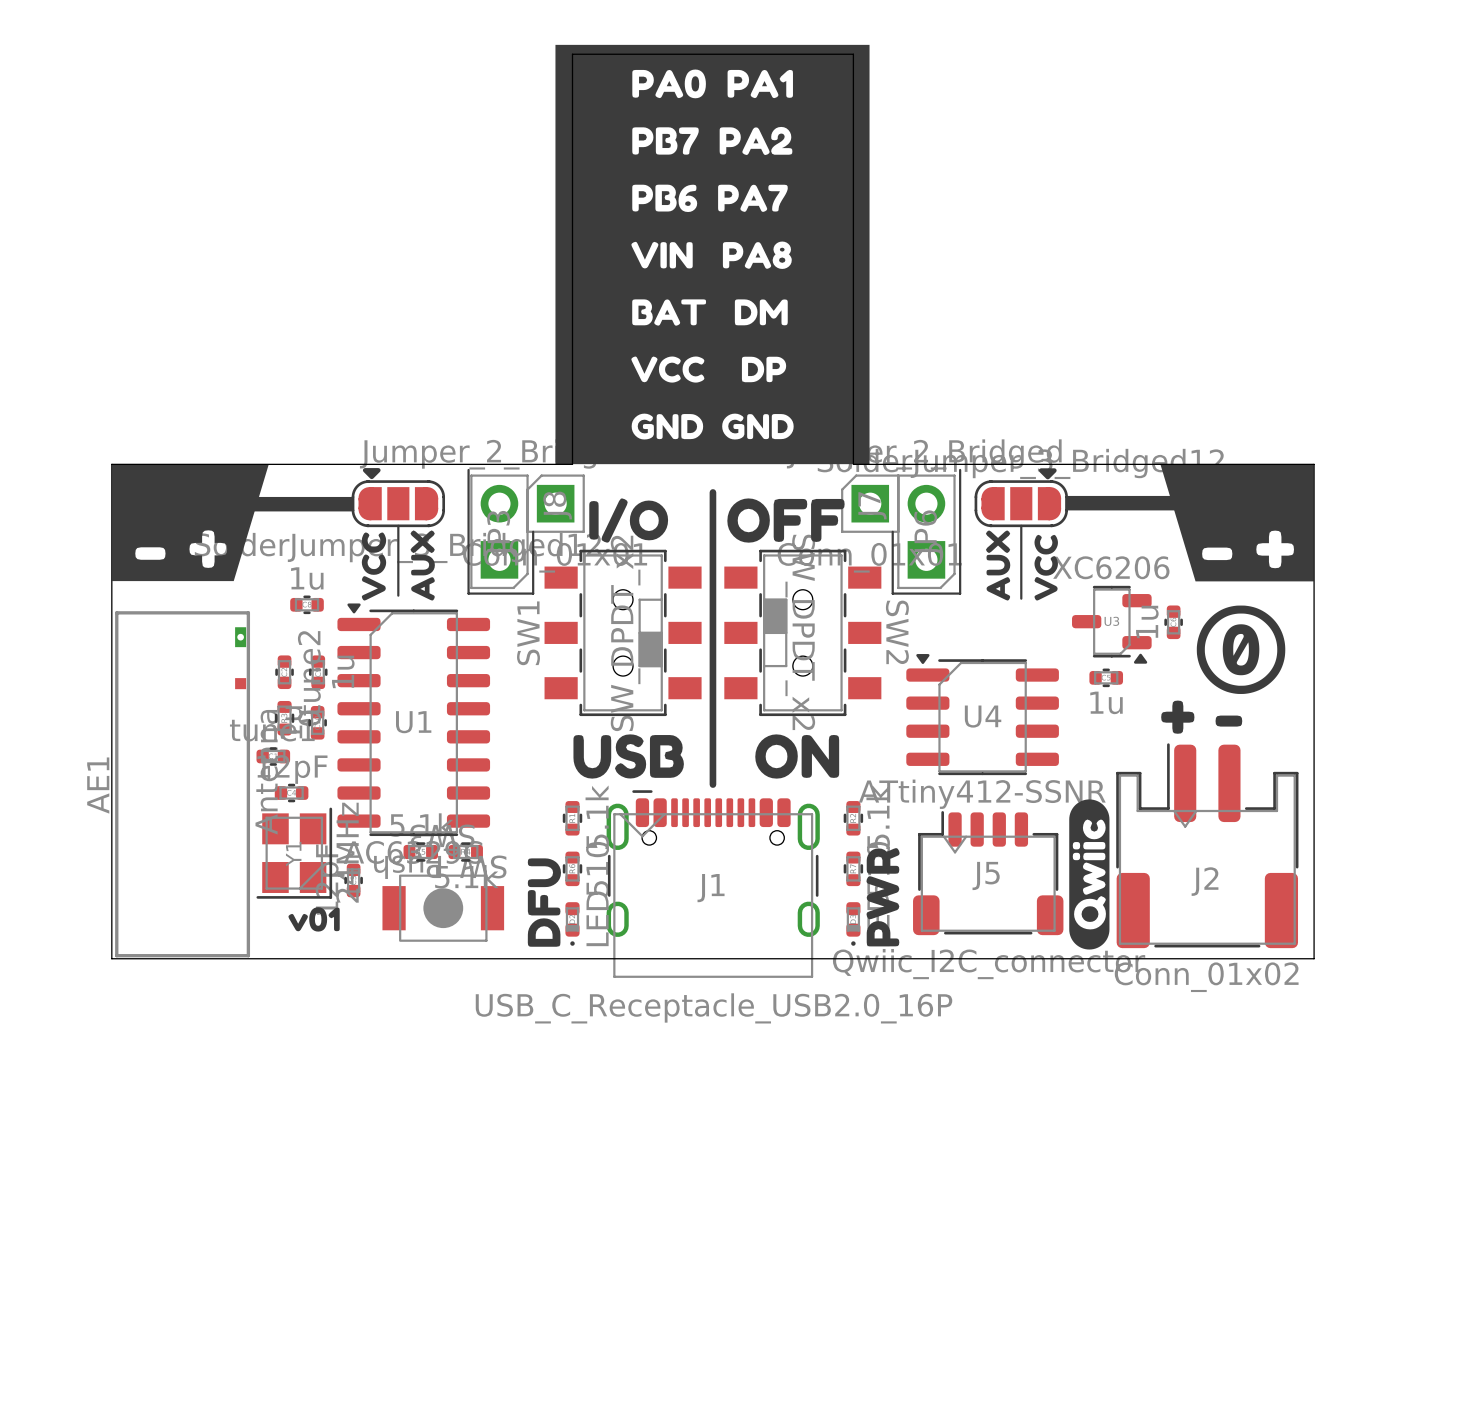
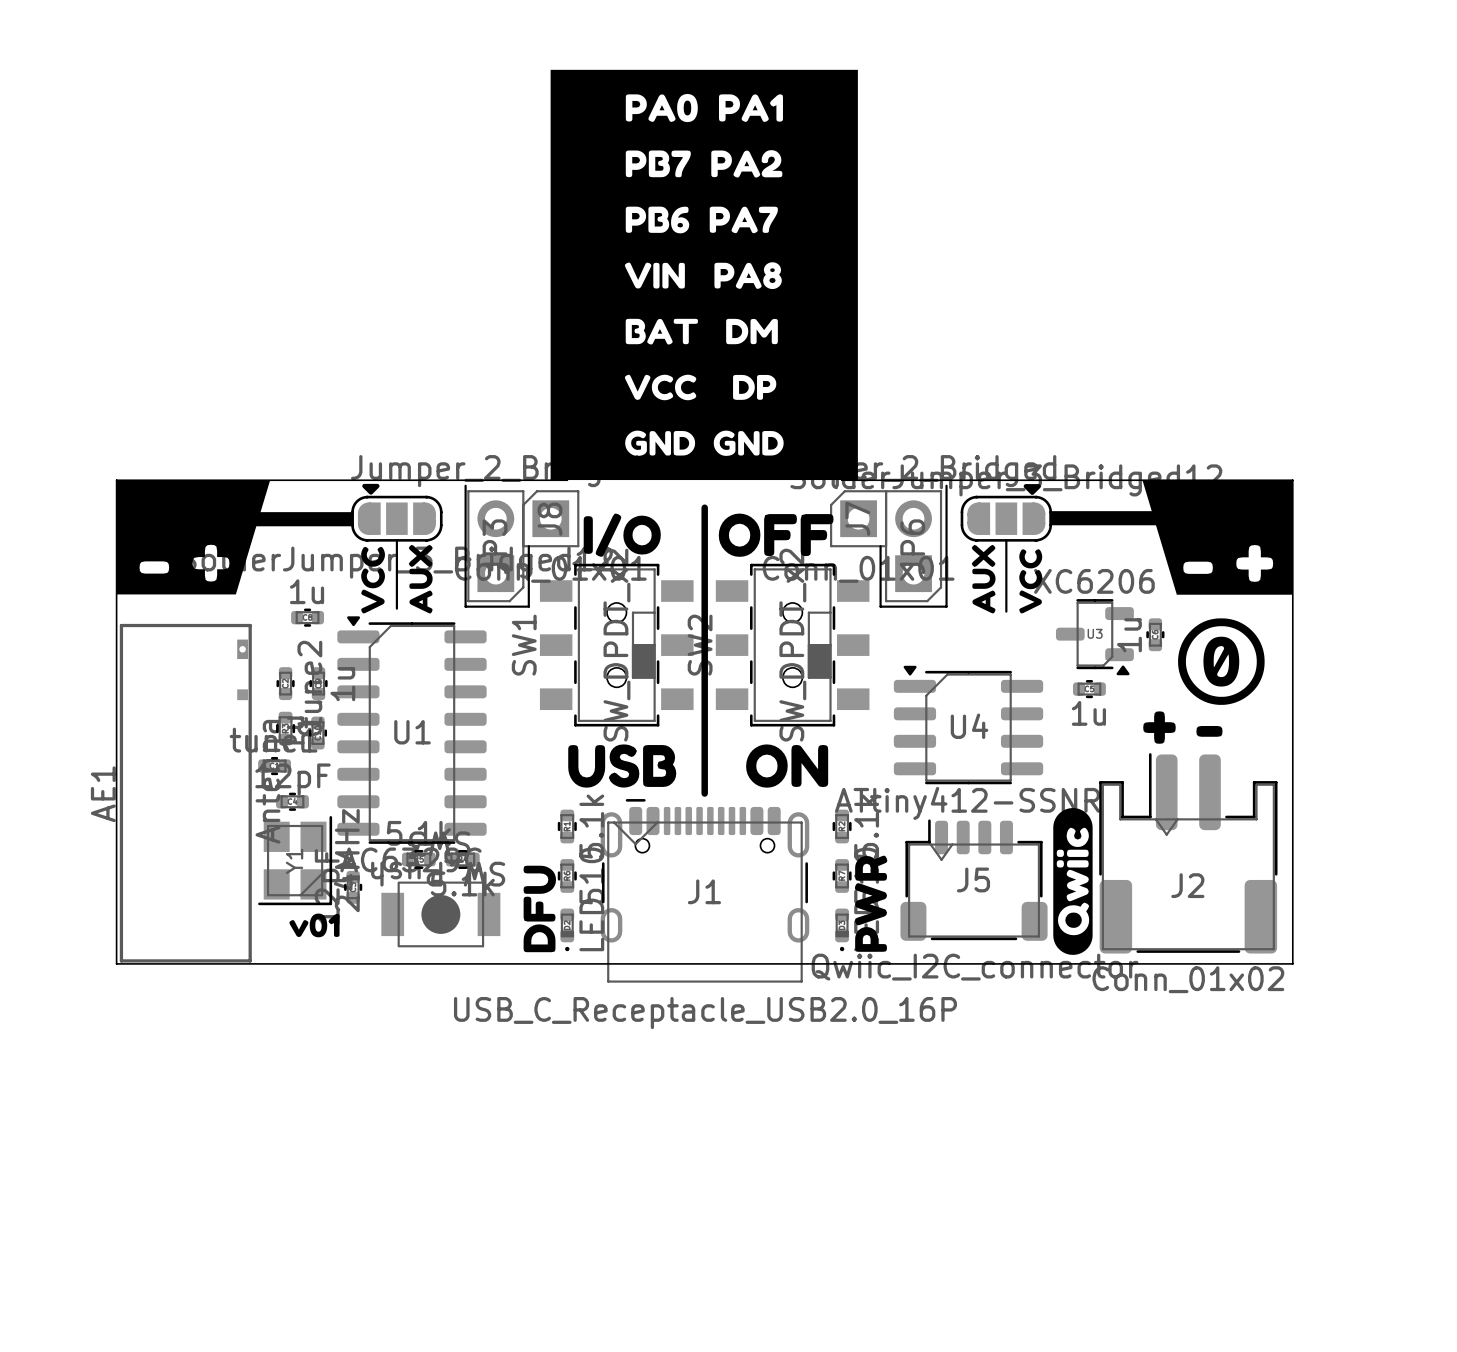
SW2 rotation: 0° (802, 632) -> 180° (792, 645)

